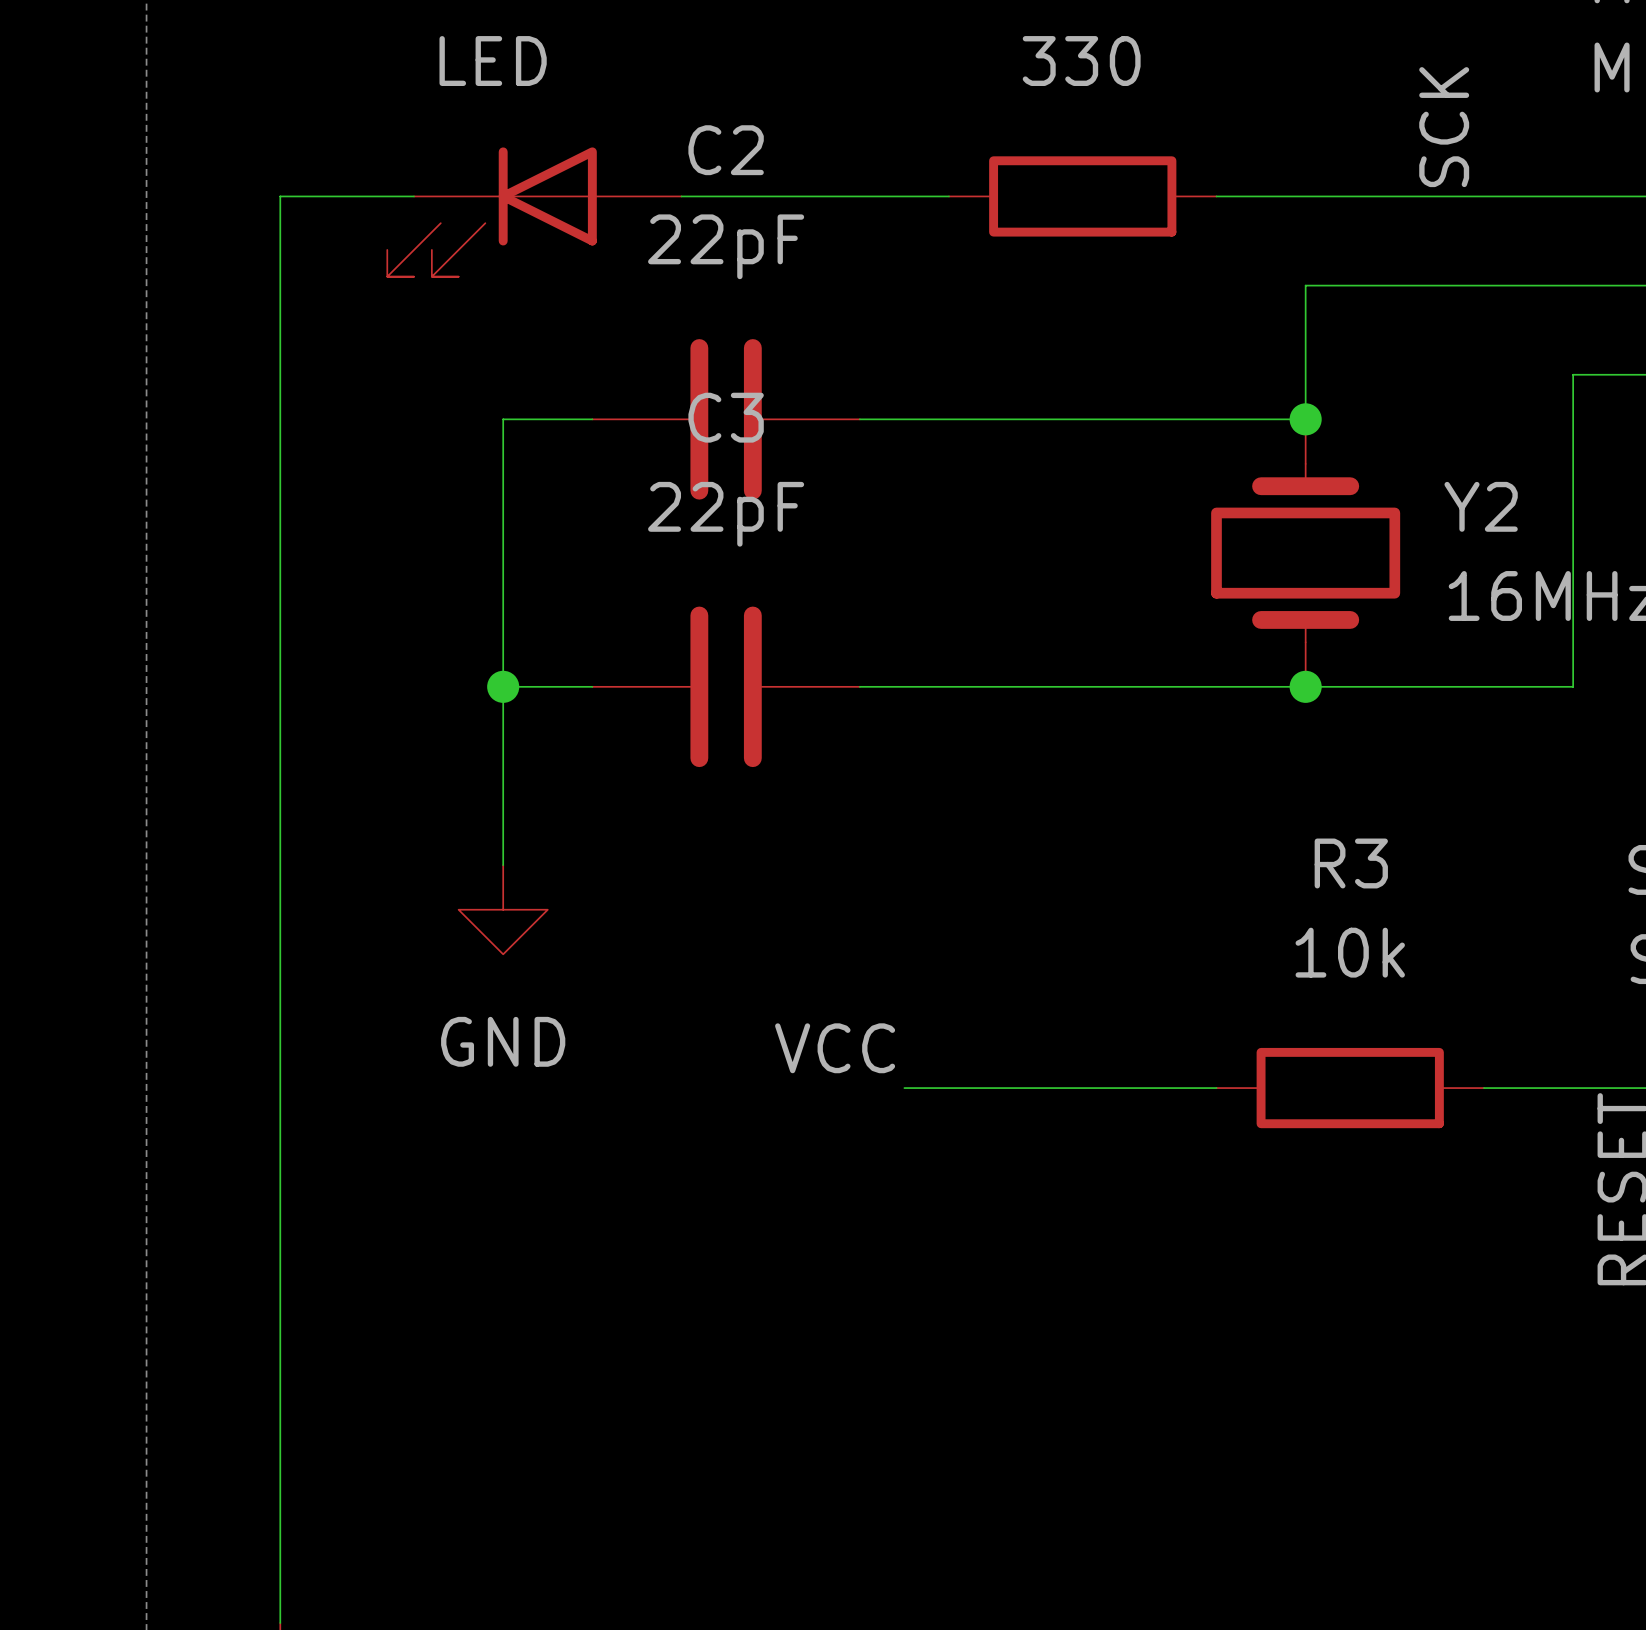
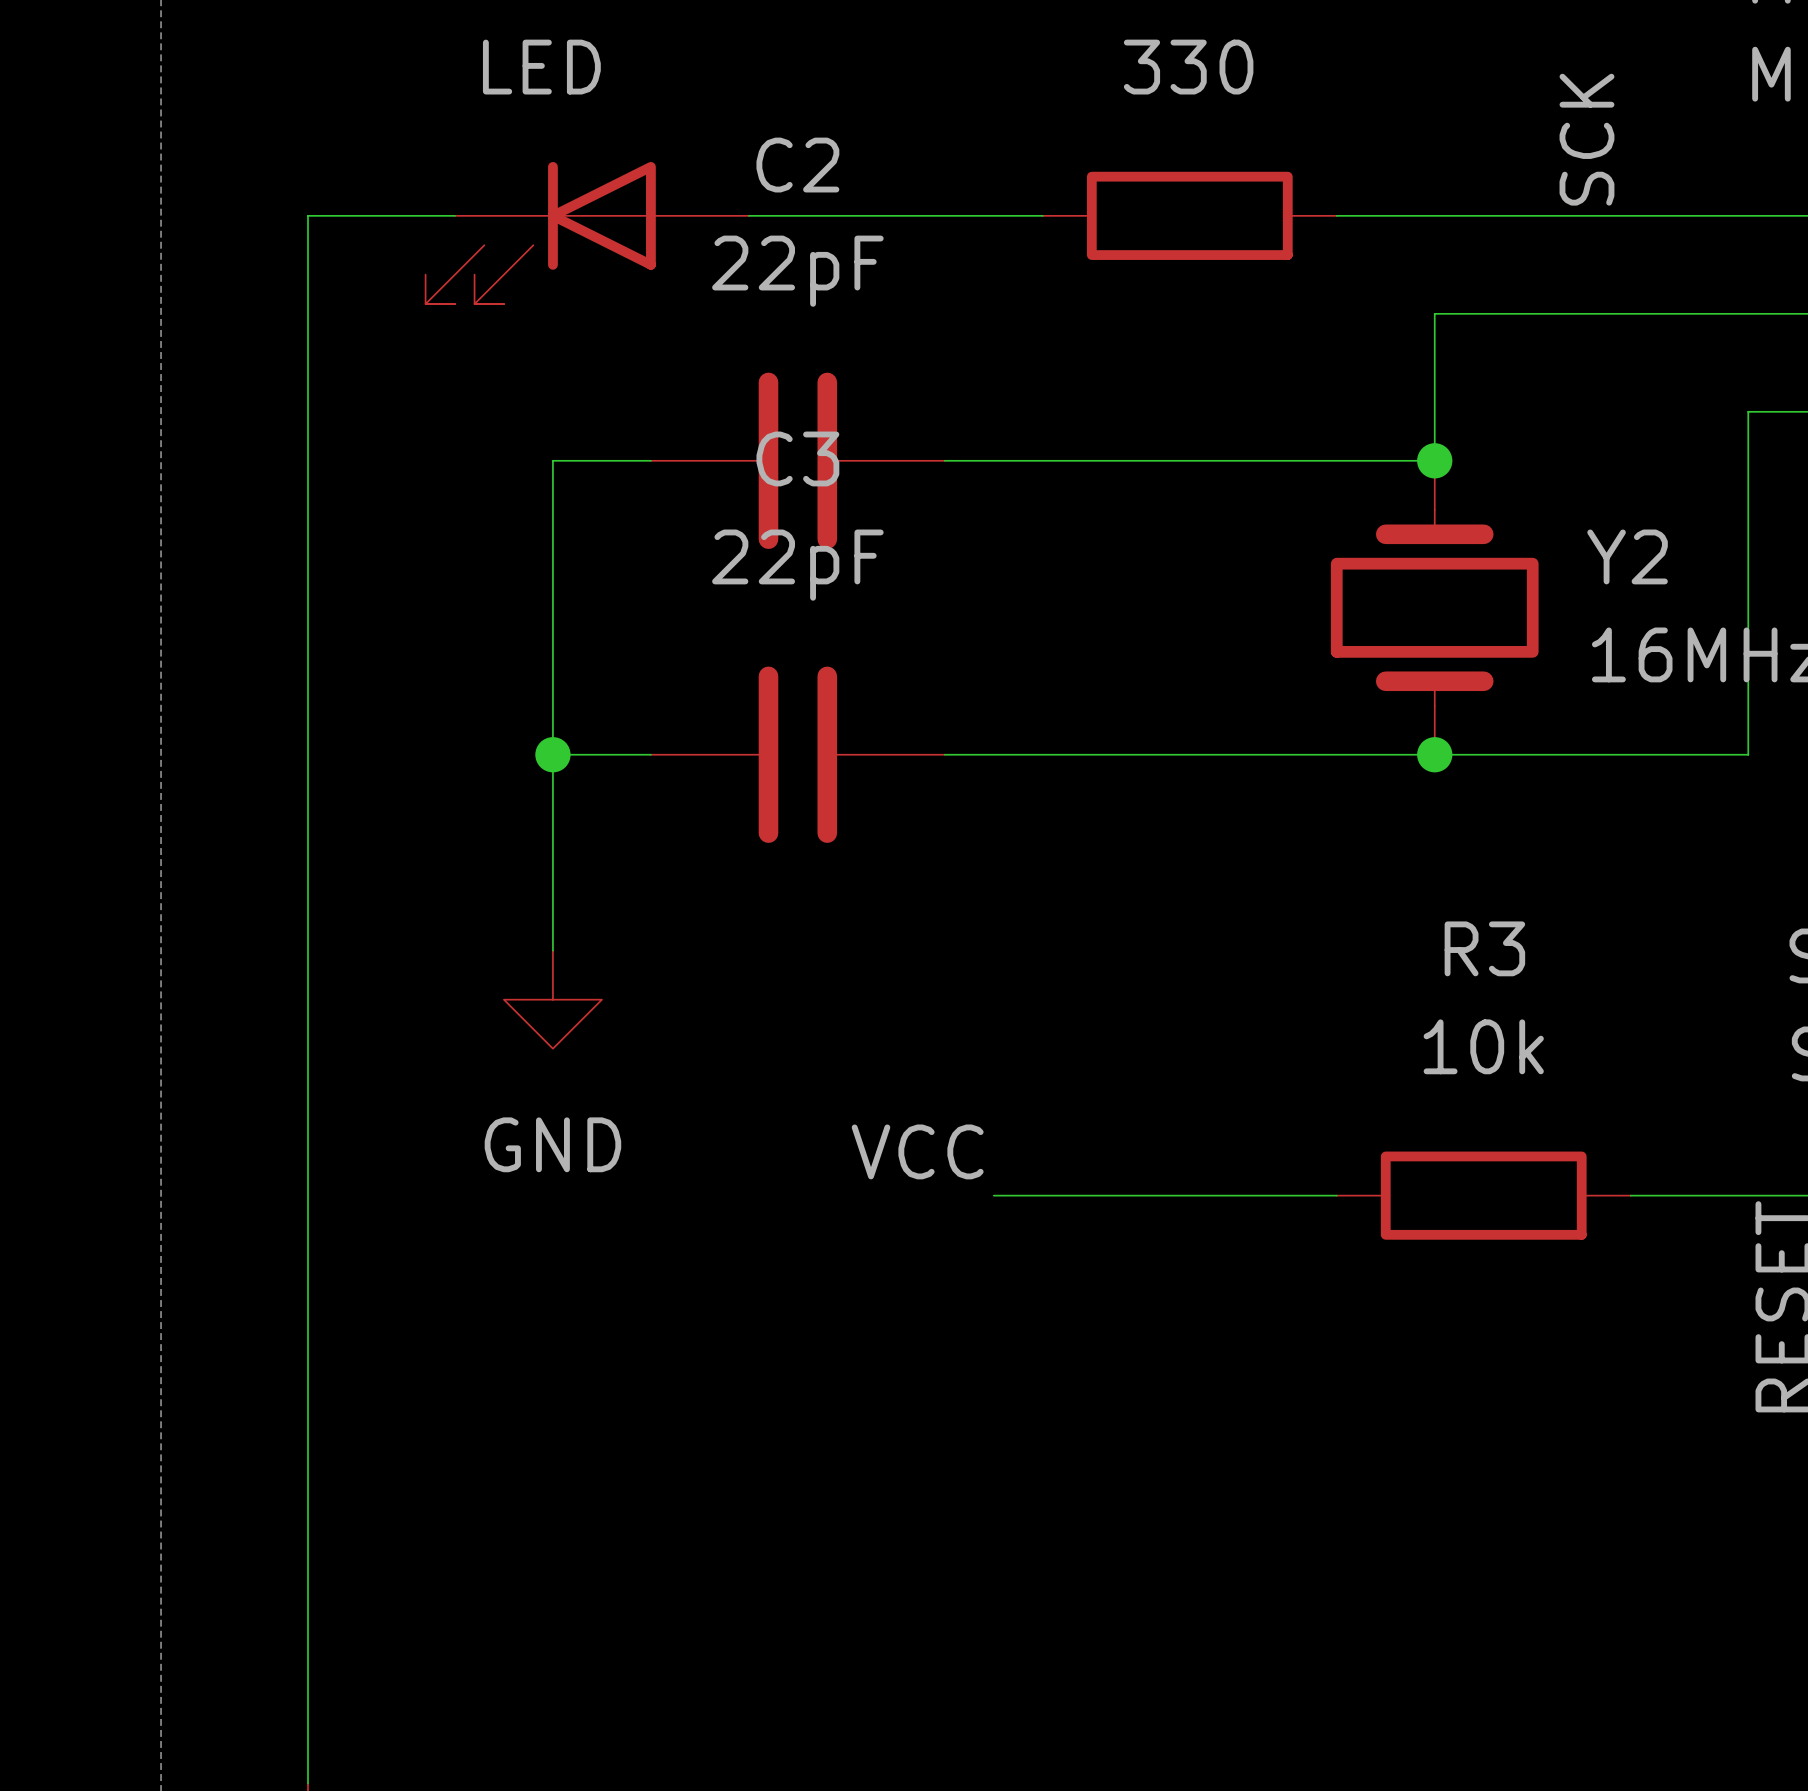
wire: (1590, 374) (1573, 374) (1573, 686) -> (1748, 411) (1748, 754) (1728, 754)

